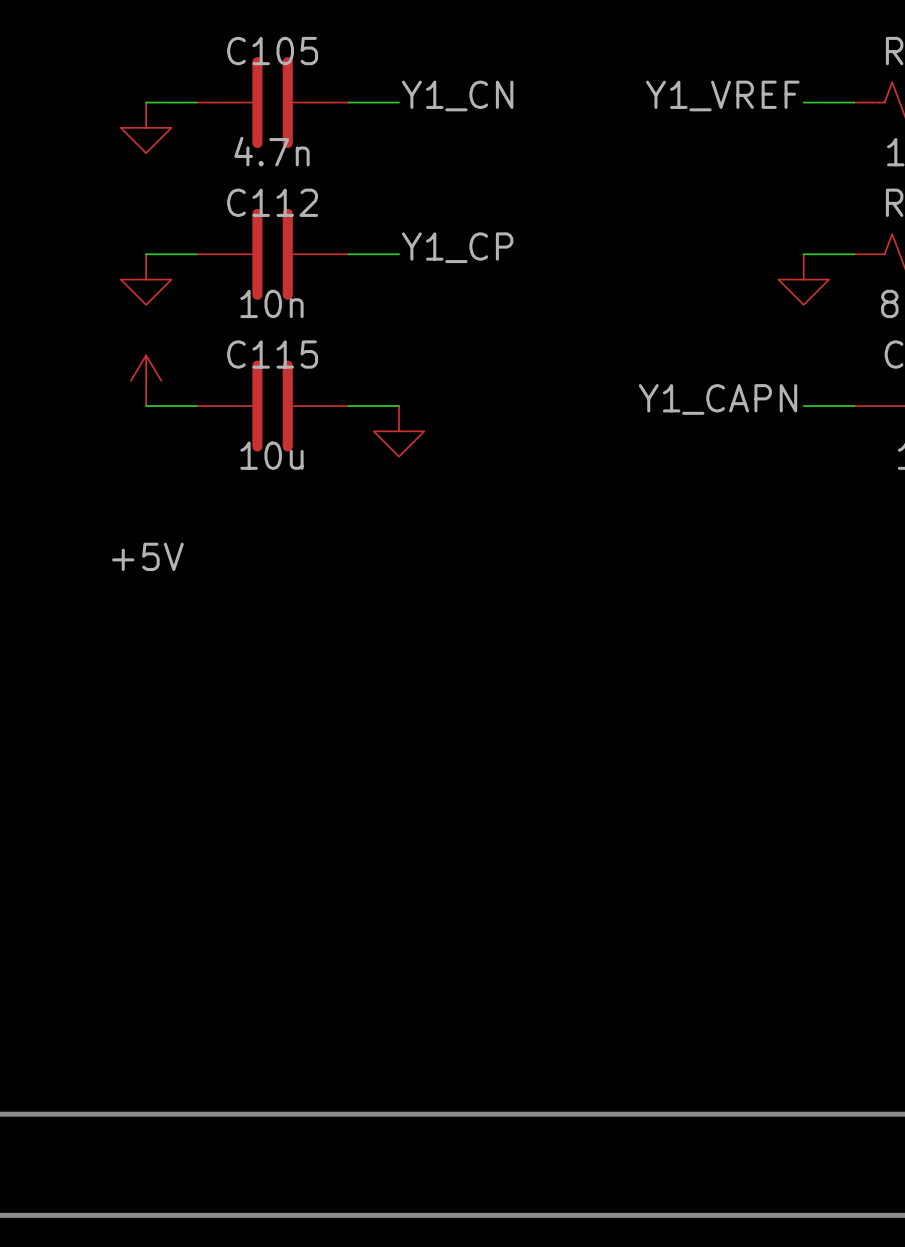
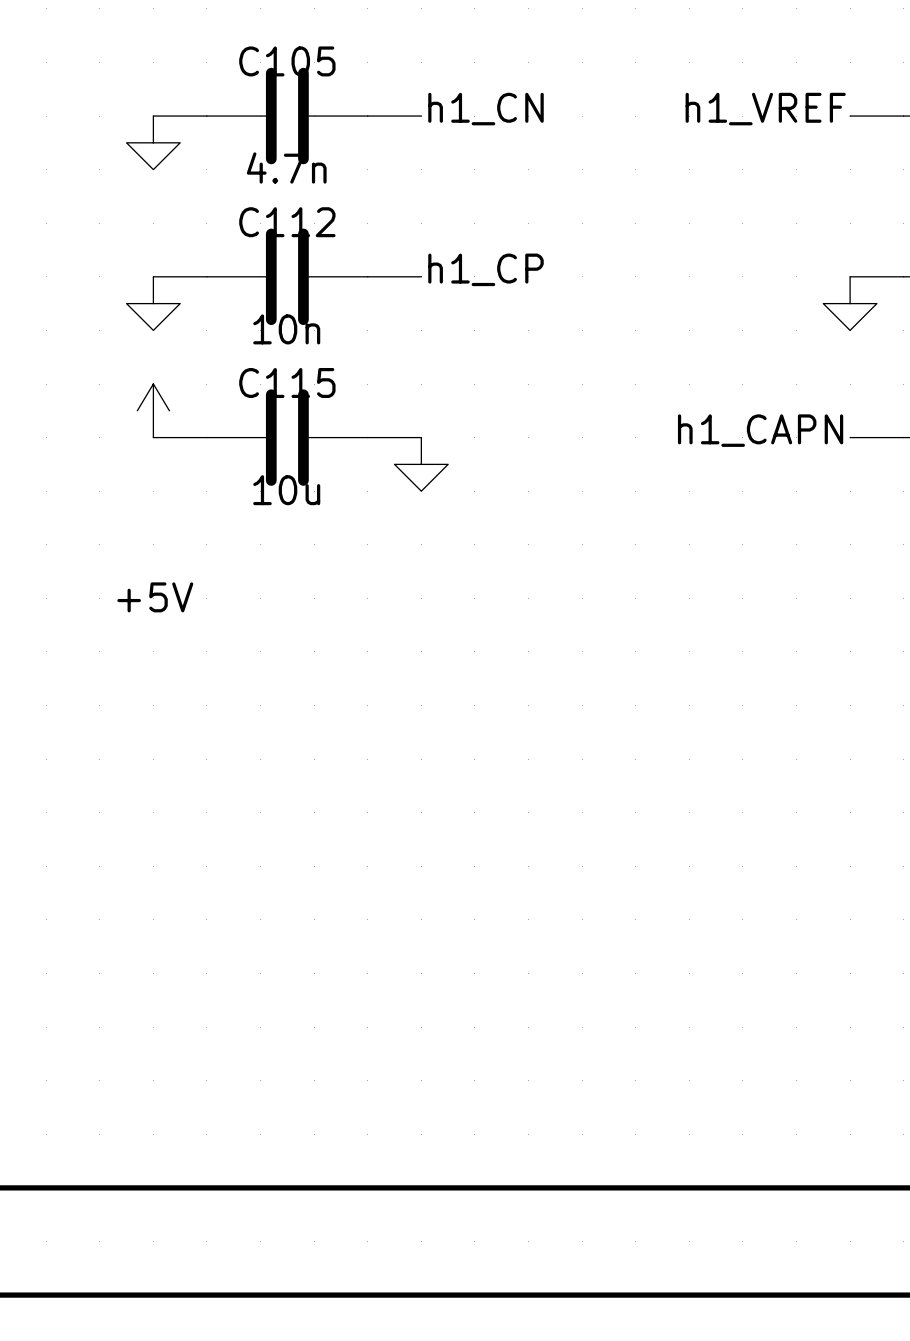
label: Y1_CN (457, 95) -> h1_CN (485, 109)
label: Y1_VREF (722, 95) -> h1_VREF (765, 109)
label: Y1_CP (457, 247) -> h1_CP (485, 269)
label: Y1_CAPN (718, 399) -> h1_CAPN (760, 430)

